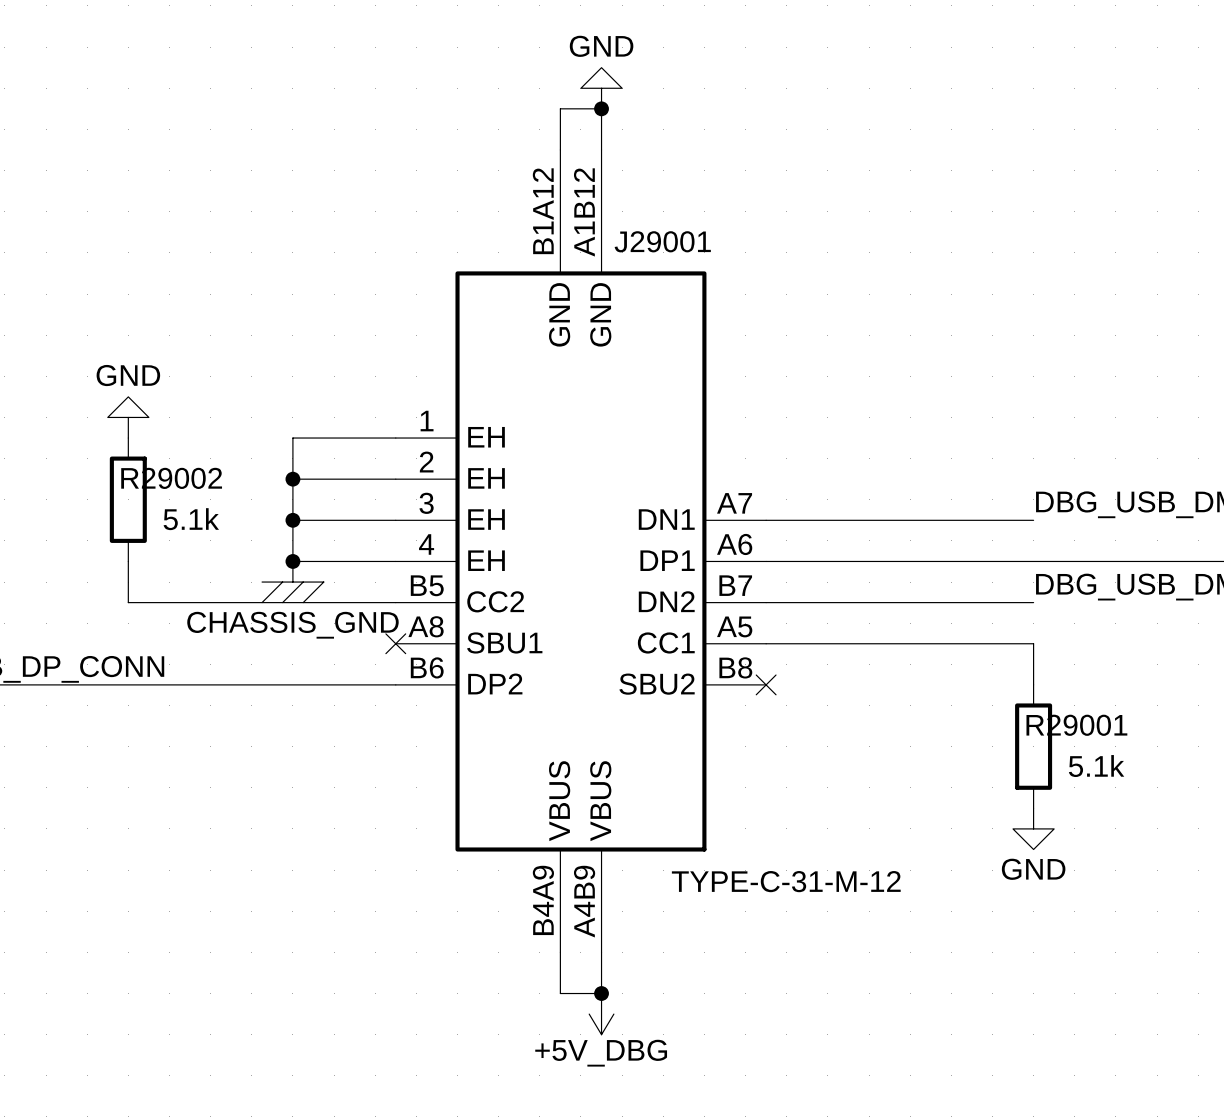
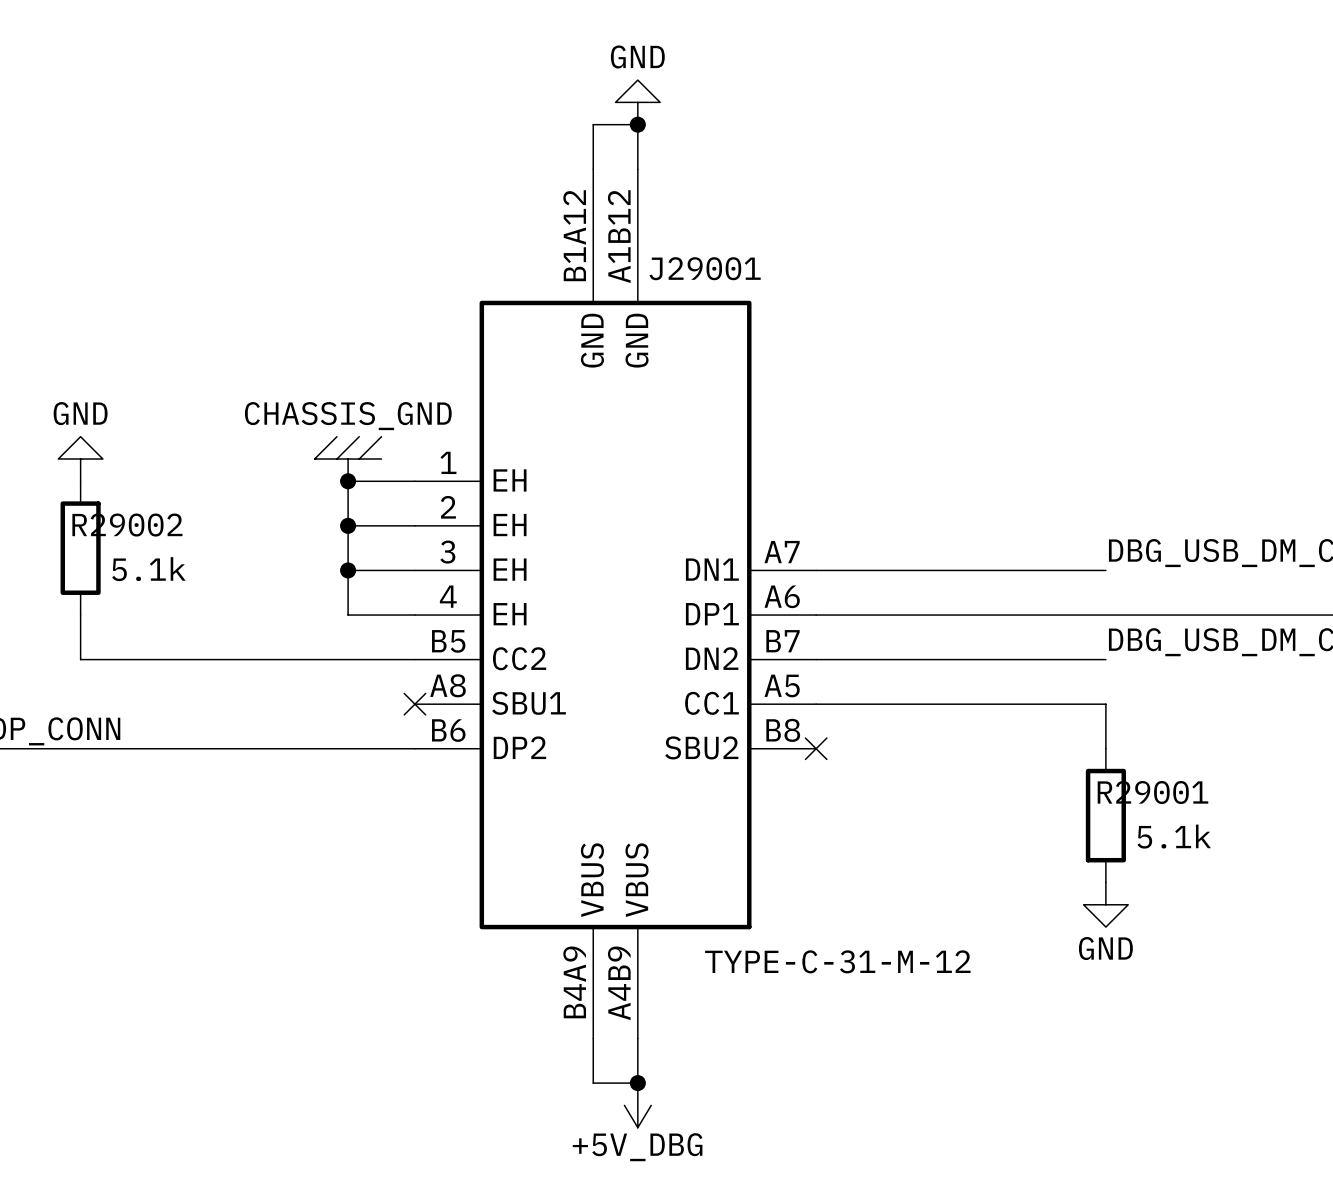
power symbol position: GND (128, 417) -> GND (80, 459)
wire: (334, 438) (292, 438) (292, 561) (334, 561) -> (348, 481) (348, 615)
junction: none -> (348, 481)
wire: (292, 479) (334, 479) -> none
junction: (292, 479) -> none
junction: none -> (348, 525)
R29002 position: (128, 499) -> (80, 548)
wire: (292, 520) (334, 520) -> none
junction: (292, 520) -> none
junction: none -> (348, 570)
wire: (128, 561) (128, 602) -> (80, 615) (80, 659) (125, 659)
junction: (292, 561) -> none
power symbol rotation: 0° (292, 582) -> 180° (348, 459)
power symbol position: CHASSIS_GND (292, 582) -> CHASSIS_GND (348, 459)

